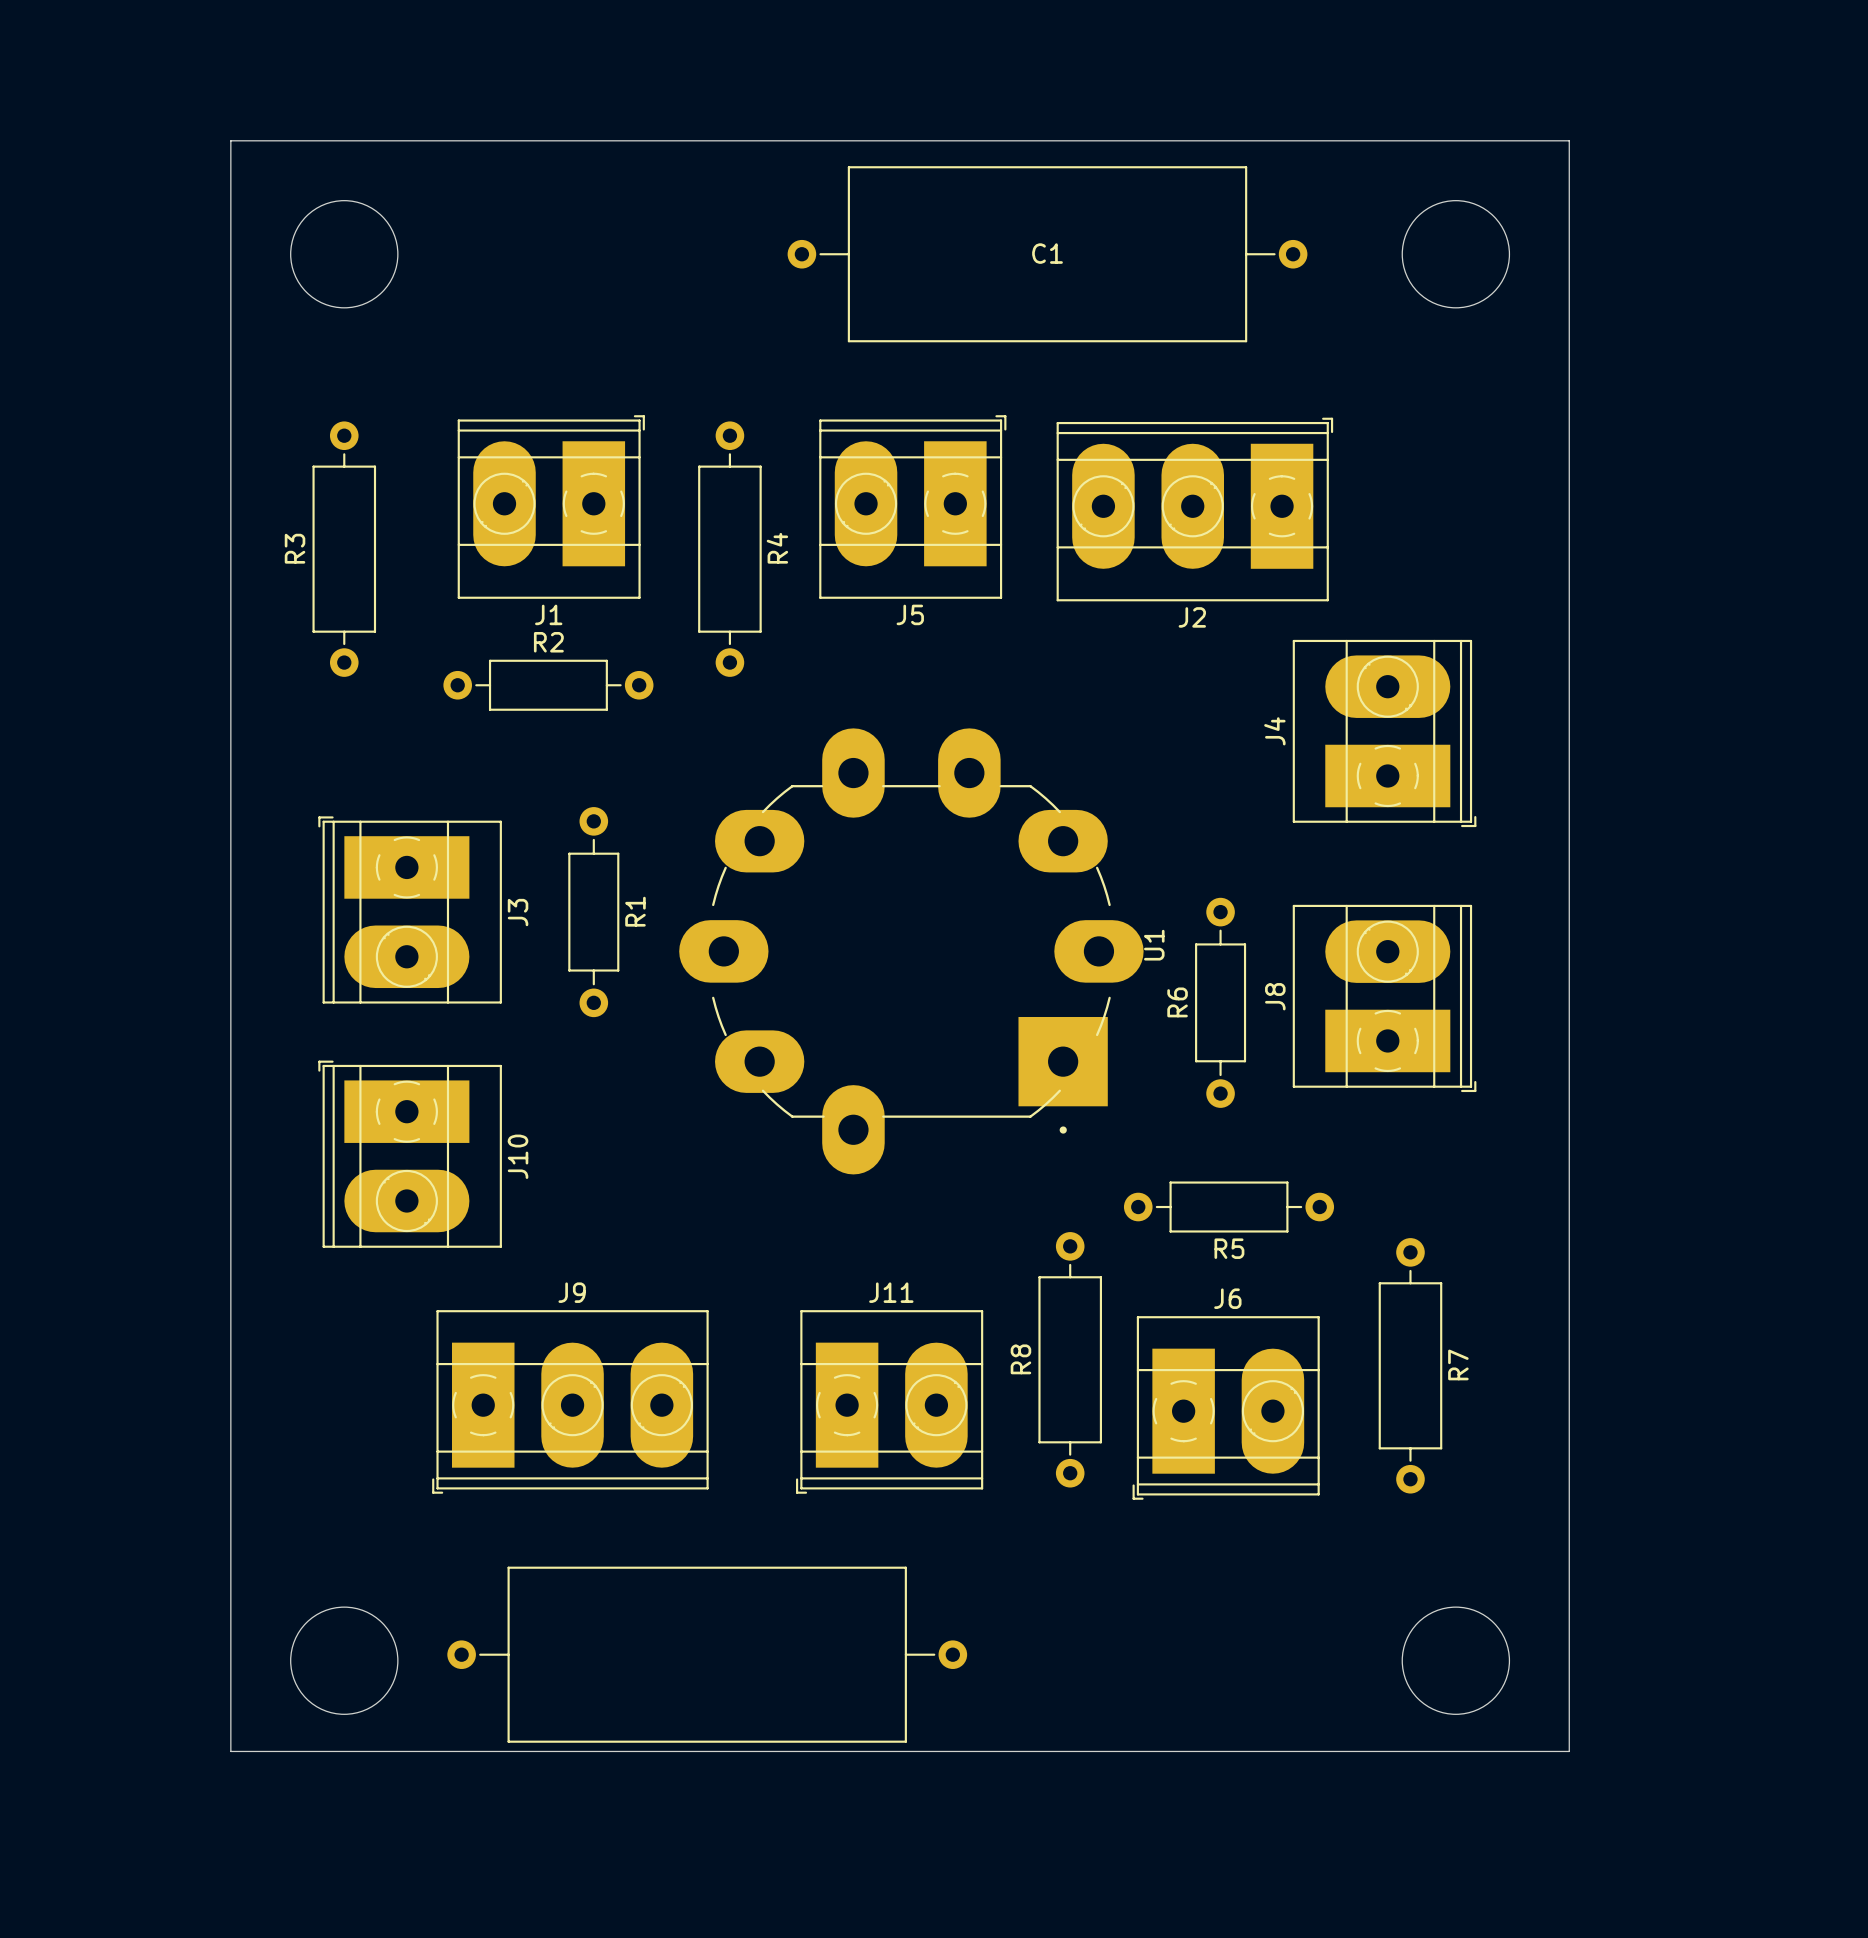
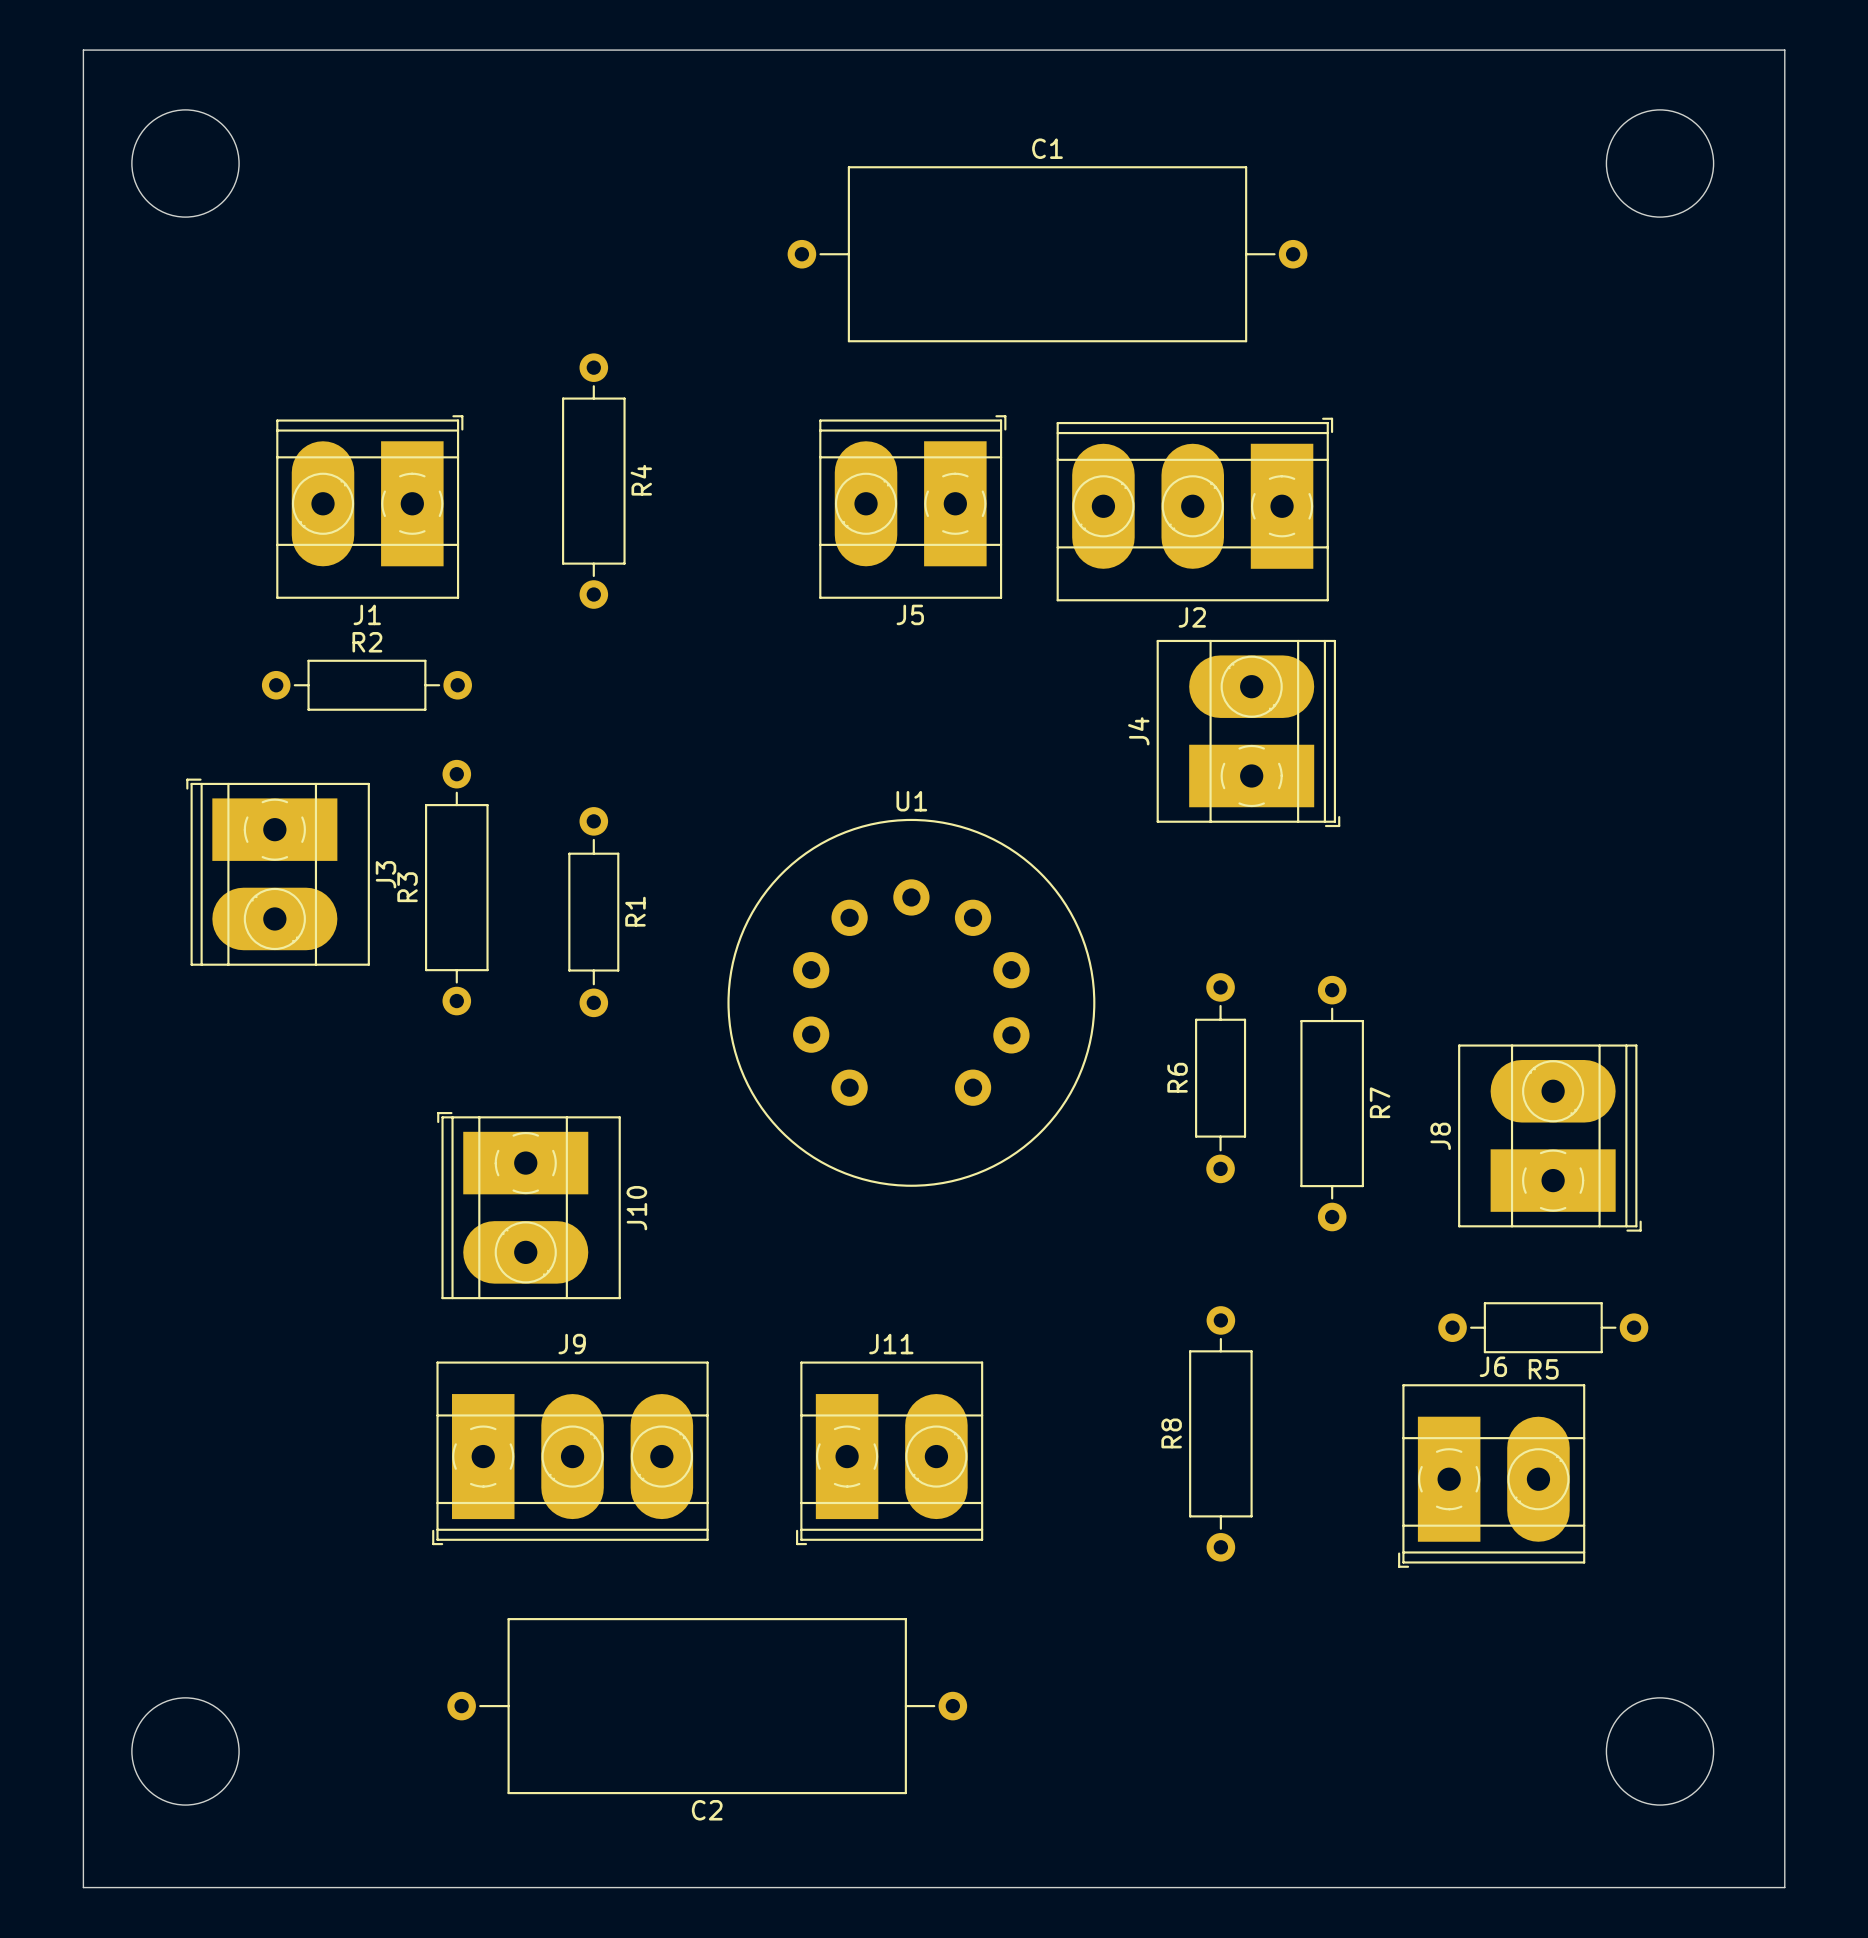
board edge: (230, 140) (1569, 140) (1569, 1751) (230, 1751) (230, 140) -> (83, 50) (83, 1887) (1784, 1887) (1784, 50) (83, 50)
C1 name position: C1 (1047, 253) -> C1 (1047, 148)
round board edge position: (344, 254) -> (185, 163)
round board edge position: (1455, 254) -> (1660, 163)
J1 position: (551, 507) -> (369, 507)
R3 position: (344, 549) -> (456, 887)
R4 position: (729, 549) -> (593, 481)
R2 position: (548, 685) -> (366, 685)
U1 footprint: [679, 728, 1144, 1175] -> [727, 818, 1096, 1187]
J4 position: (1384, 733) -> (1248, 733)
J3 position: (410, 909) -> (278, 872)
U1 name position: U1 (1154, 945) -> U1 (911, 801)
J8 position: (1384, 998) -> (1549, 1138)
R6 position: (1220, 1002) -> (1220, 1078)
J10 position: (410, 1154) -> (528, 1205)
R5 position: (1229, 1207) -> (1543, 1327)
R8 position: (1070, 1359) -> (1220, 1433)
R7 position: (1410, 1365) -> (1332, 1103)
J9 position: (570, 1401) -> (570, 1453)
J11 position: (889, 1401) -> (889, 1453)
J6 position: (1226, 1407) -> (1491, 1476)
part: (707, 1654) -> none
round board edge position: (344, 1660) -> (185, 1751)
round board edge position: (1455, 1660) -> (1660, 1751)
C2: none -> (707, 1706)

